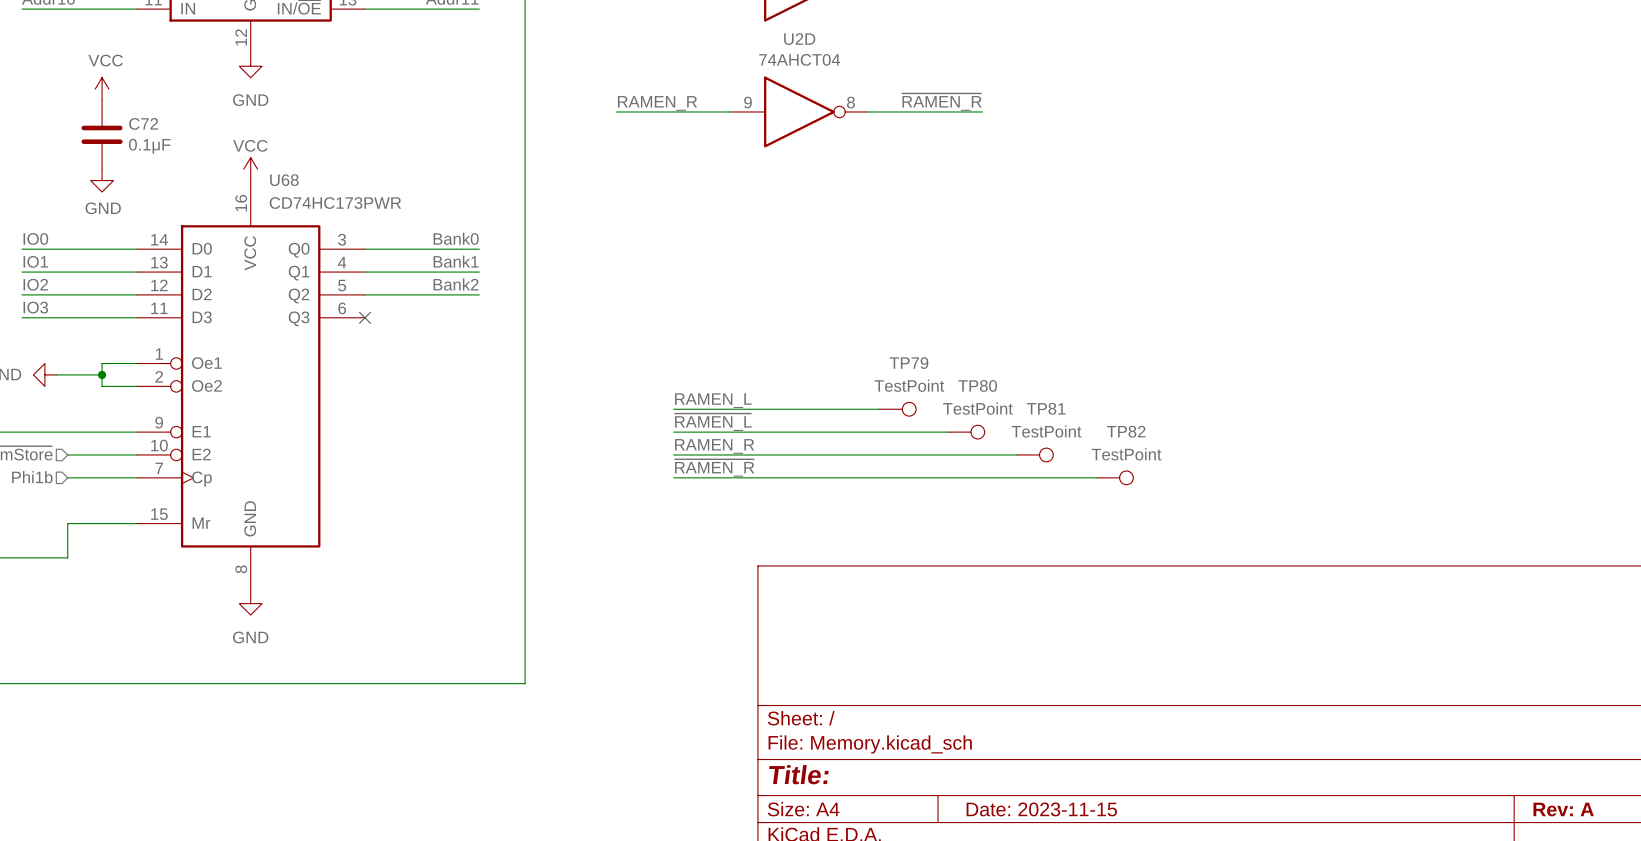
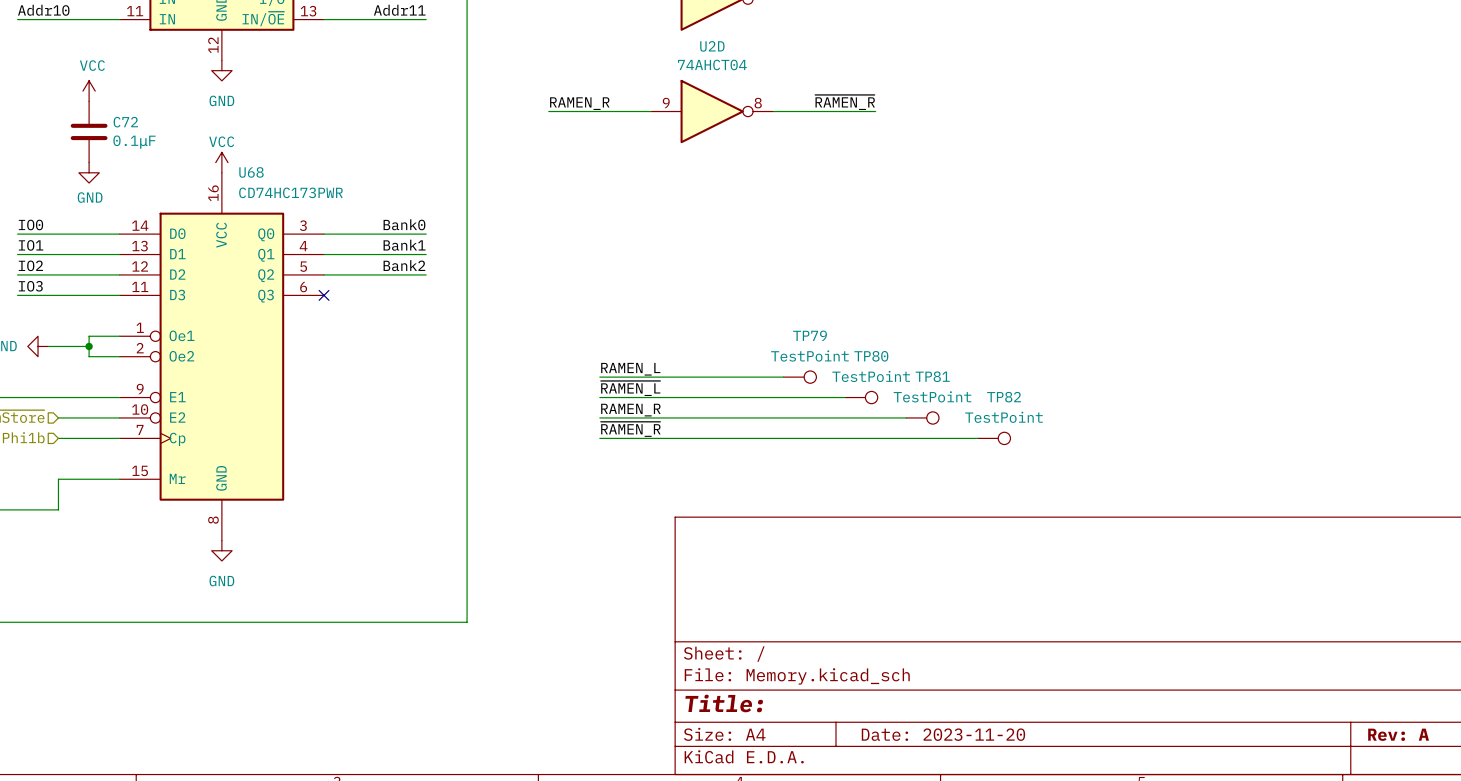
title block: Date: 2023-11-15 (1041, 809) -> Date: 2023-11-20 (943, 734)

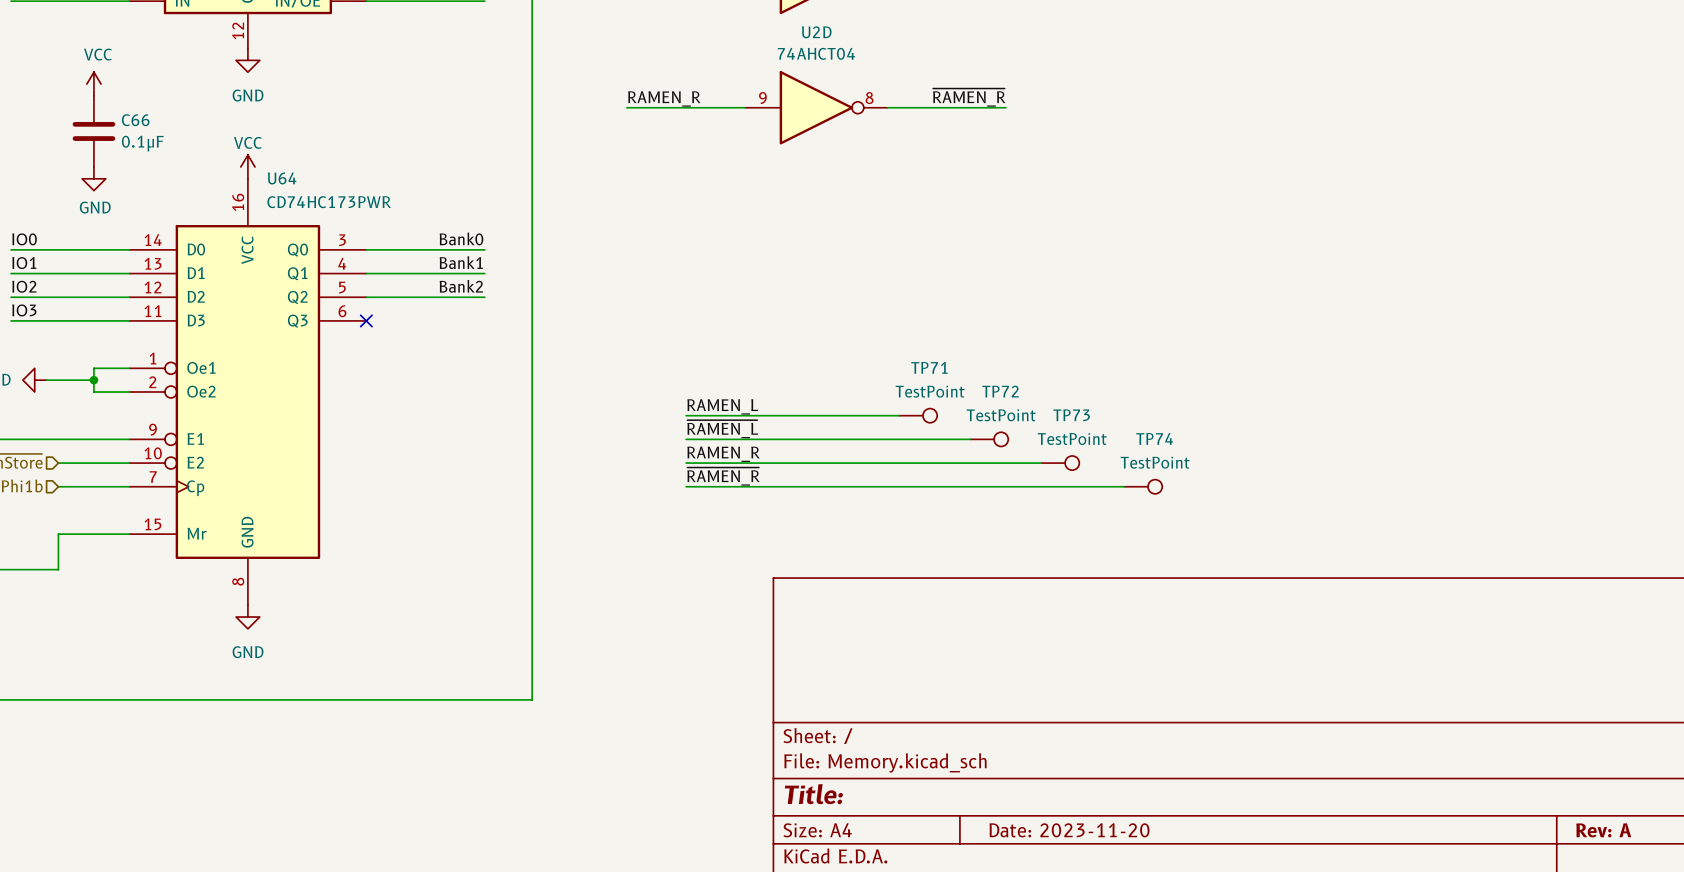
C72 name: C72 (125, 122) -> C66 (135, 120)
U68 name: U68 (251, 172) -> U64 (282, 178)
TP79 name: TP79 (809, 335) -> TP71 (929, 367)
TP80 name: TP80 (871, 356) -> TP72 (1000, 391)
TP81 name: TP81 (932, 376) -> TP73 (1071, 415)
TP82 name: TP82 (1004, 397) -> TP74 (1154, 438)

